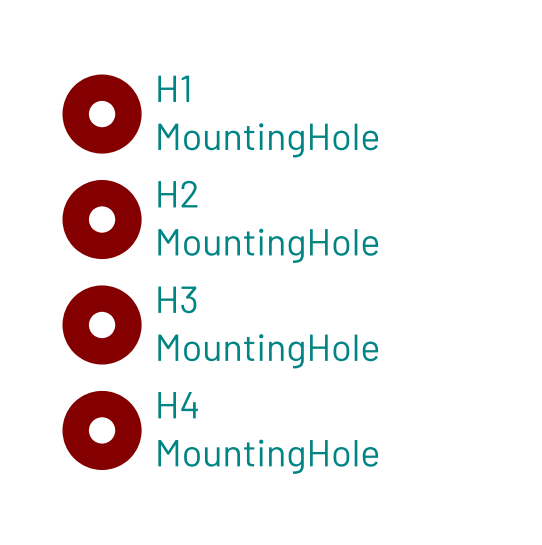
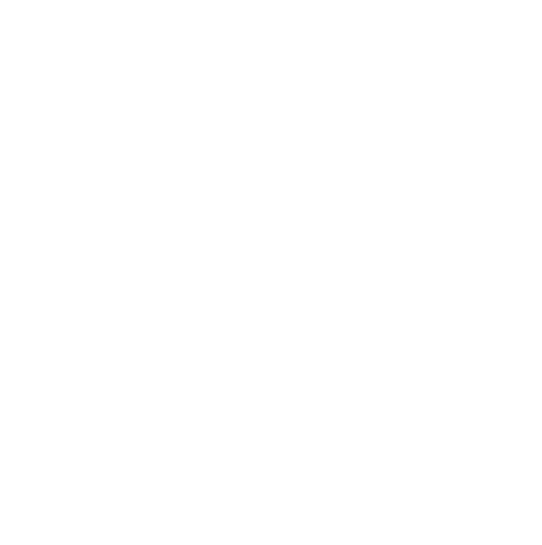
H1: MountingHole (102, 114) -> none
H2: MountingHole (102, 219) -> none
H3: MountingHole (102, 324) -> none
H4: MountingHole (102, 430) -> none

